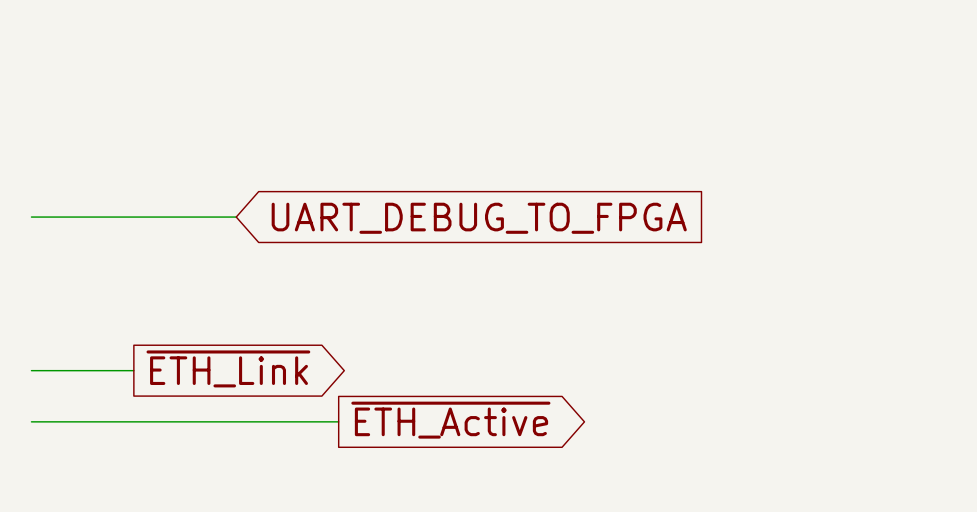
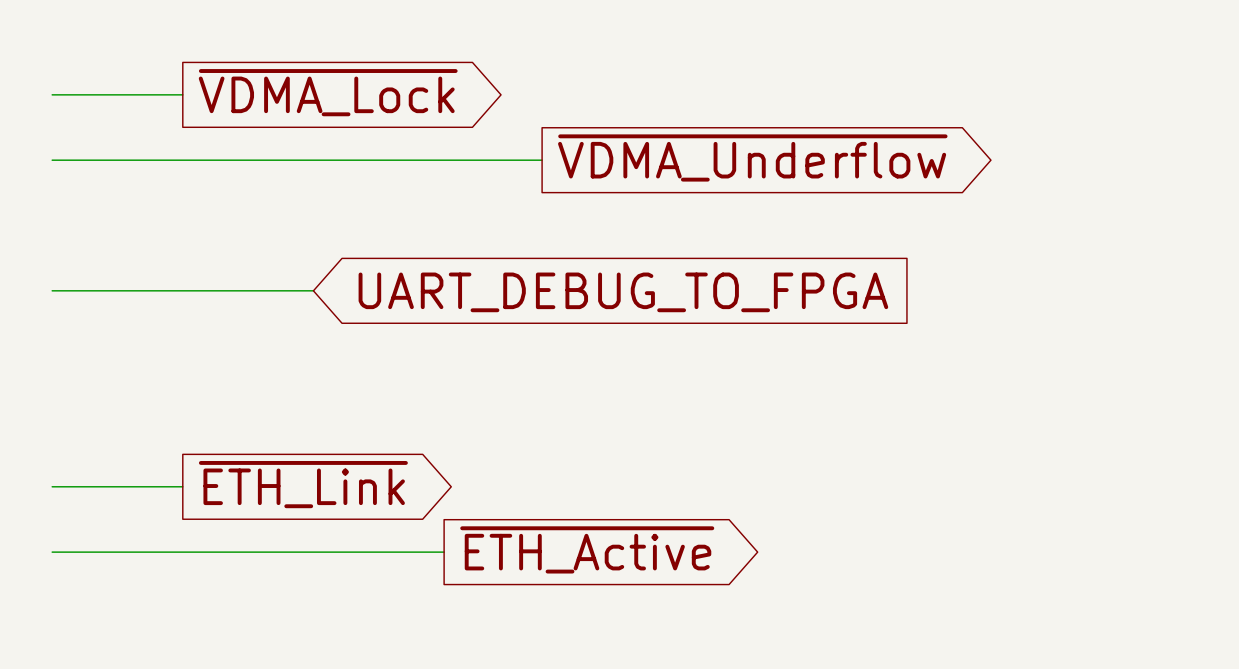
global label: none -> ~{VDMA_Lock} (328, 92)
wire: none -> (52, 94) (182, 94)
global label: none -> ~{VDMA_Underflow} (752, 157)
wire: none -> (52, 160) (542, 160)

